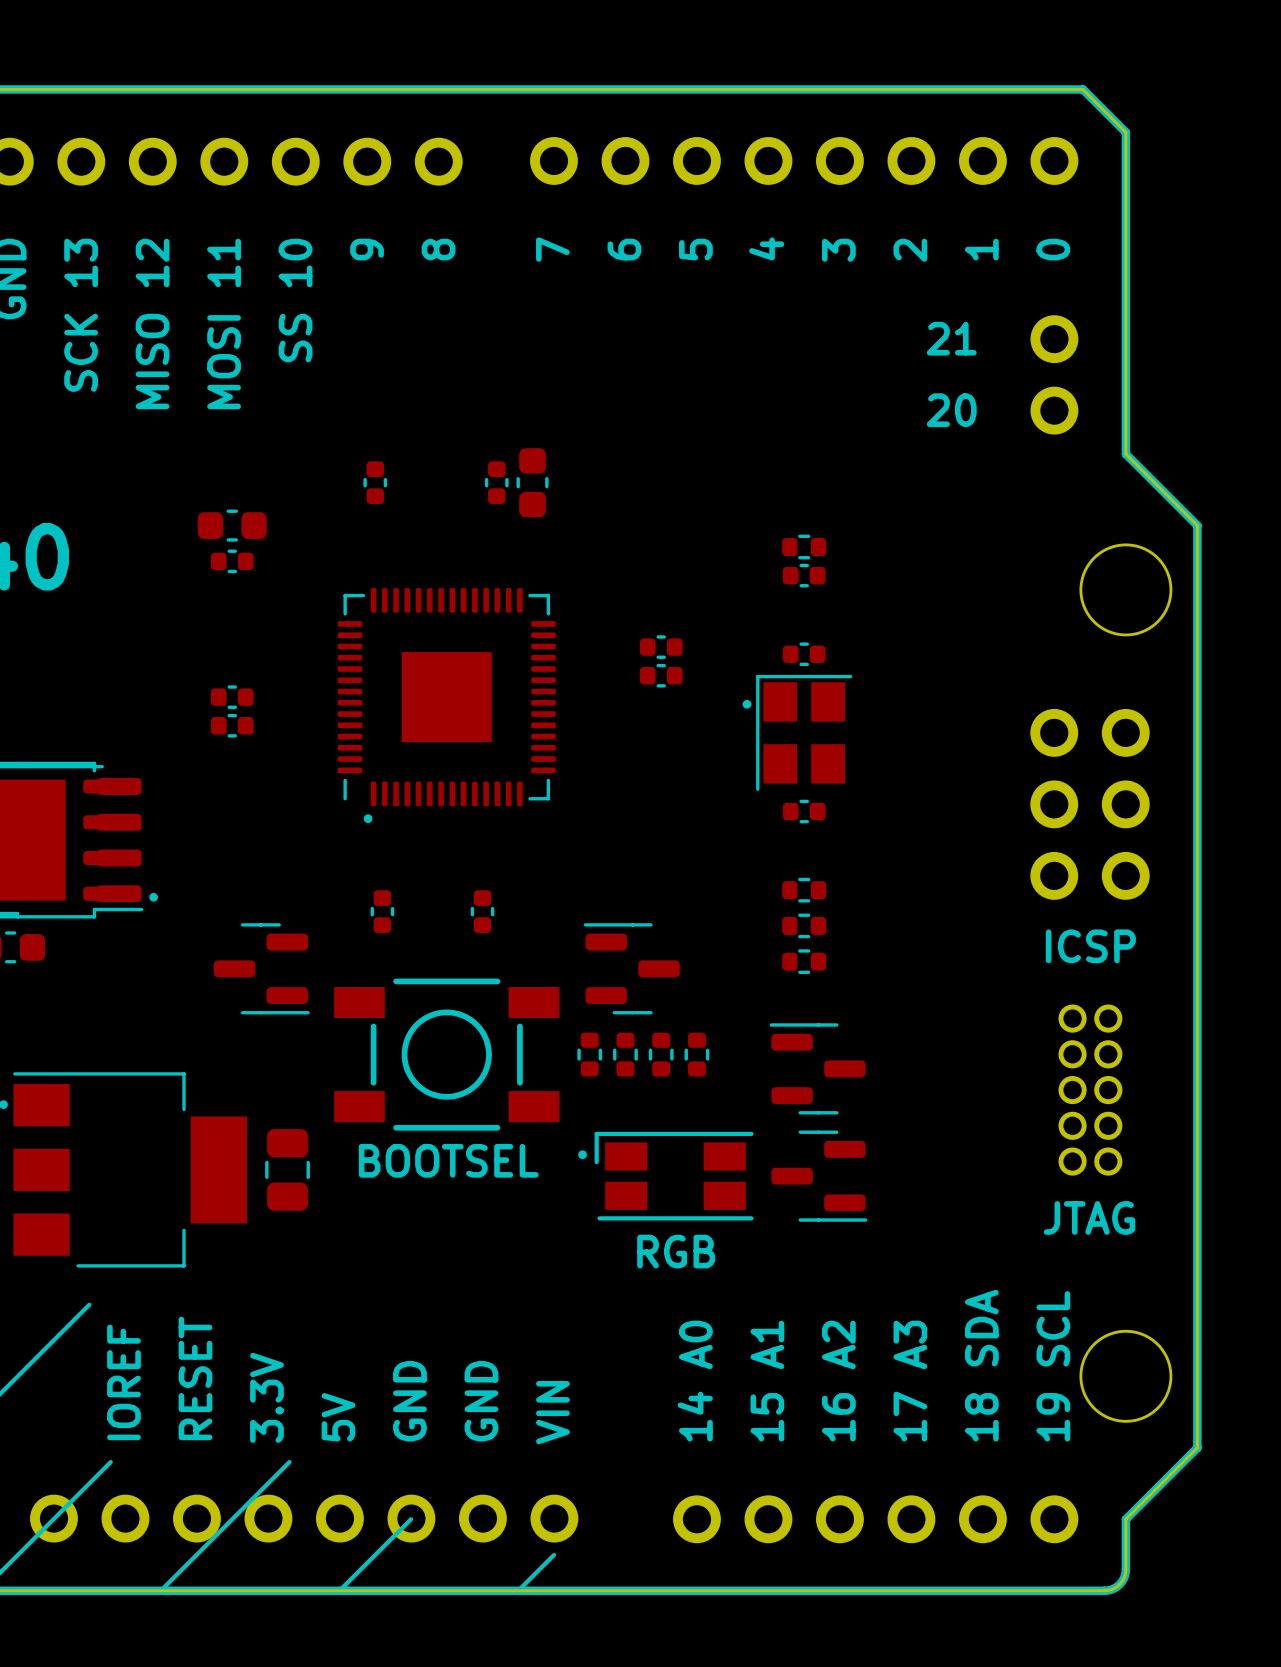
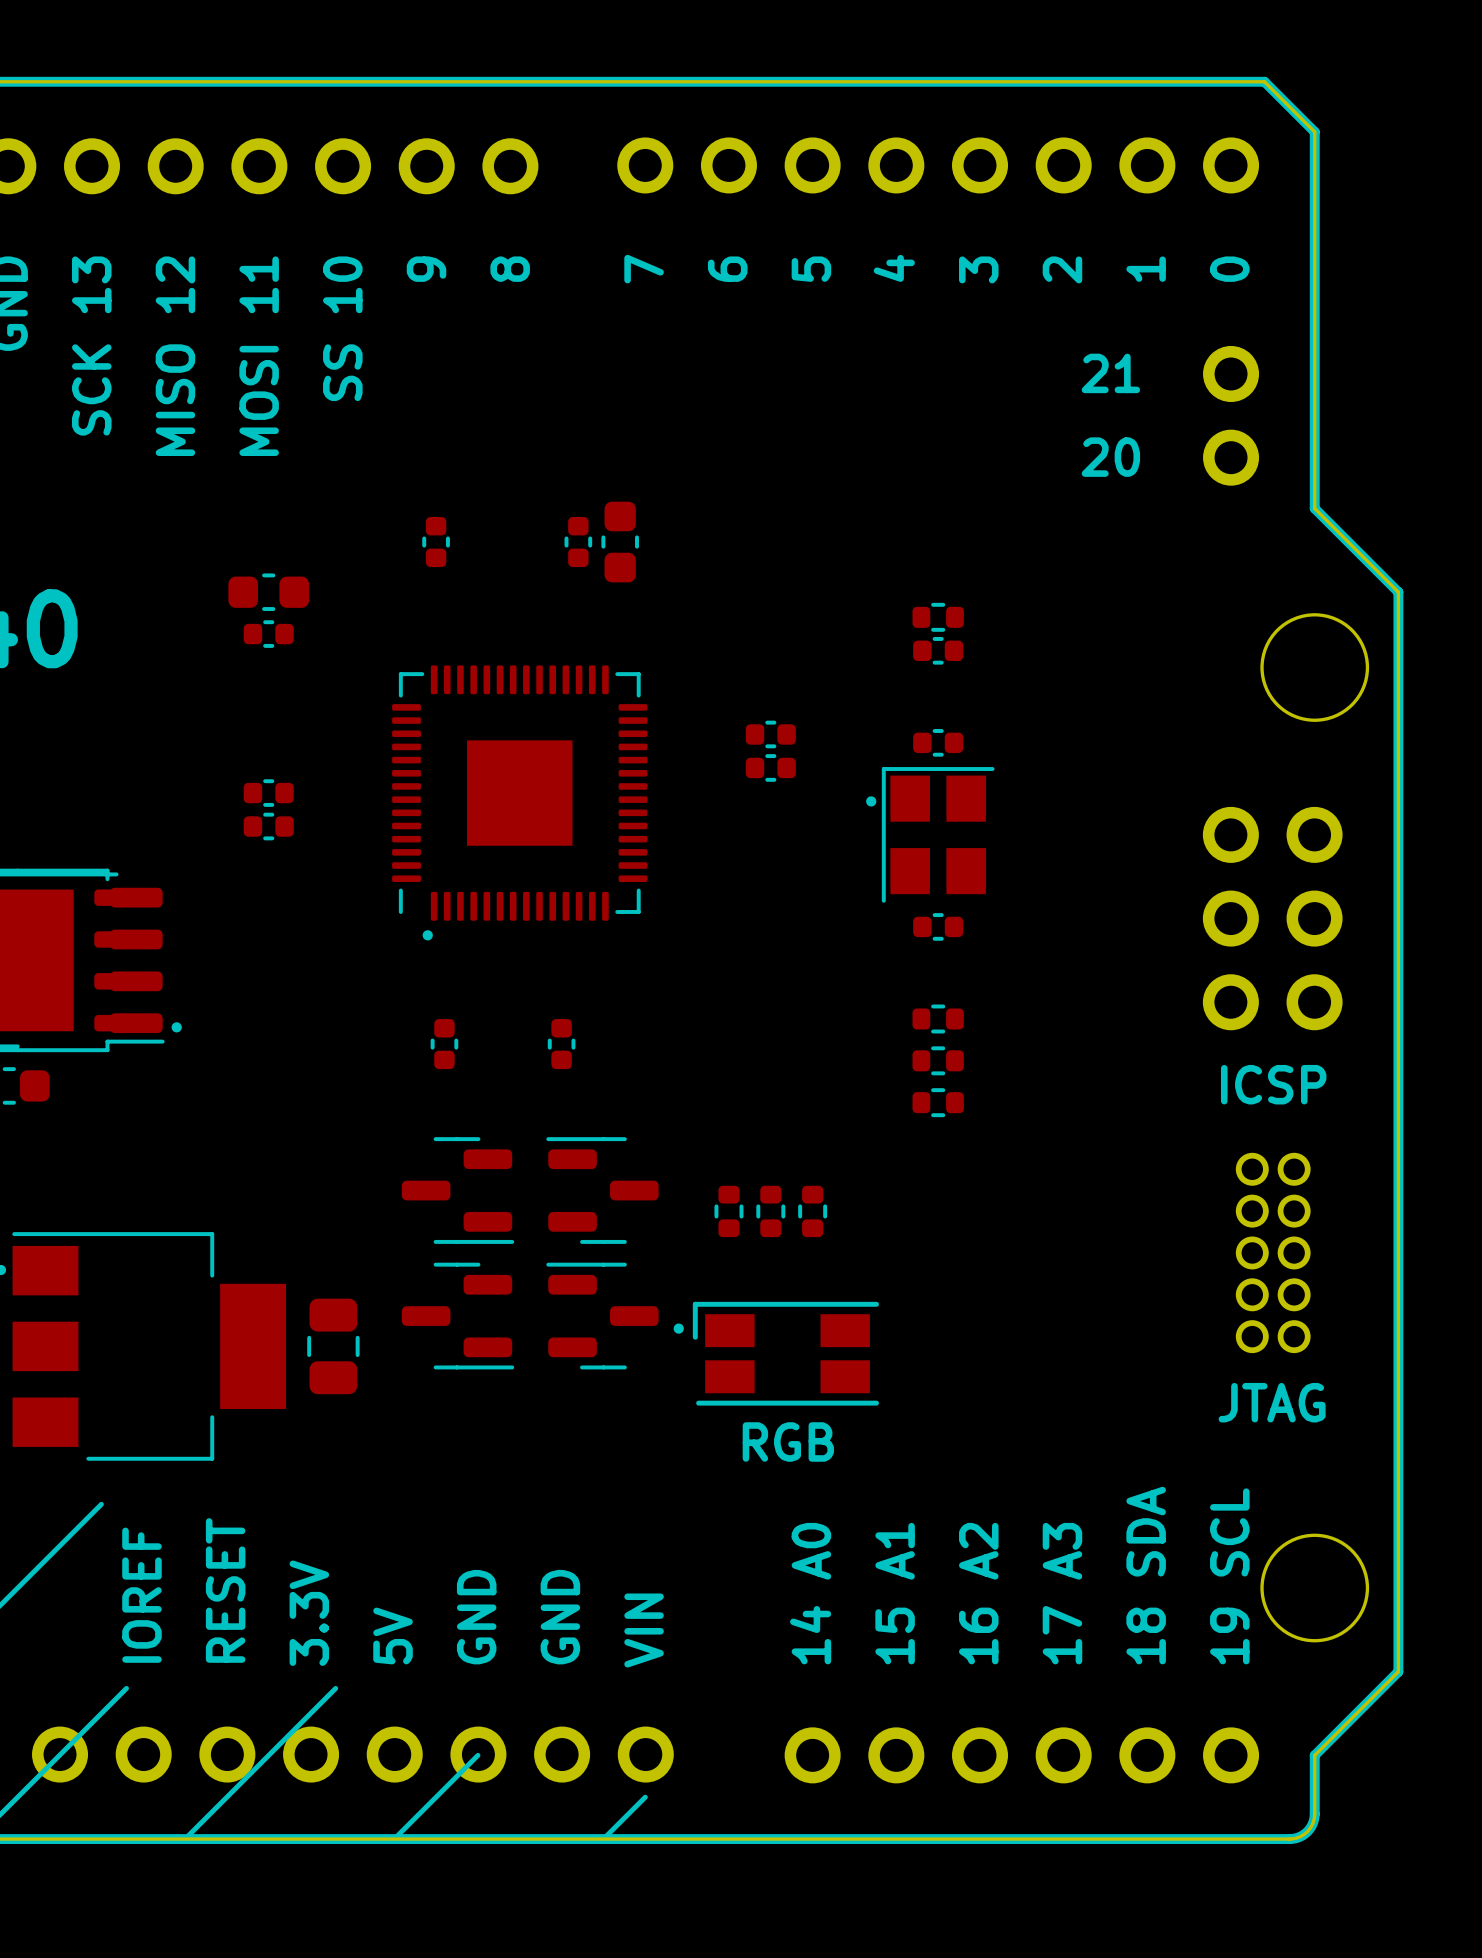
part: (261, 968) -> none
part: (631, 968) -> none
part: none -> (457, 1190)
part: none -> (602, 1190)
part: BOOTSEL (446, 1054) -> none
part: (589, 1054) -> none
part: (817, 1068) -> none
part: none -> (457, 1316)
part: none -> (602, 1316)
part: (819, 1176) -> none

